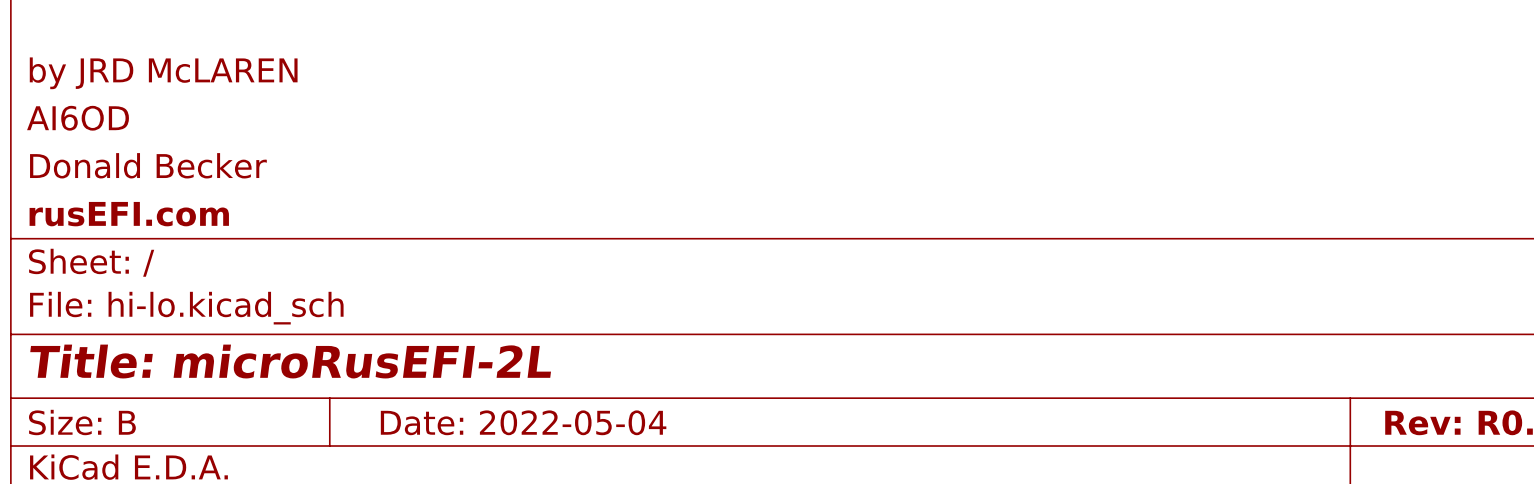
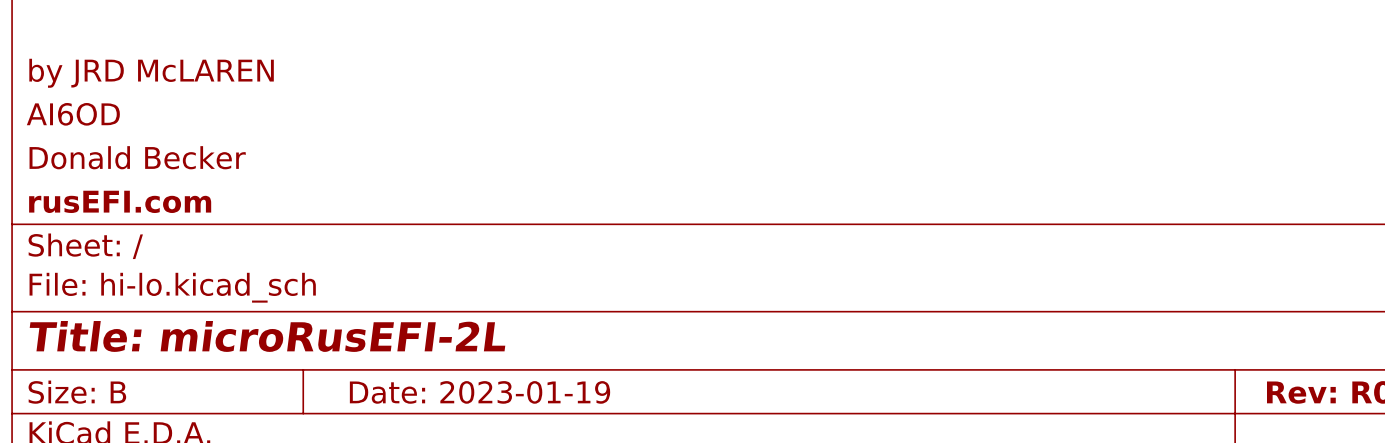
title block: Date: 2022-05-04 (523, 422) -> Date: 2023-01-19 (480, 392)

